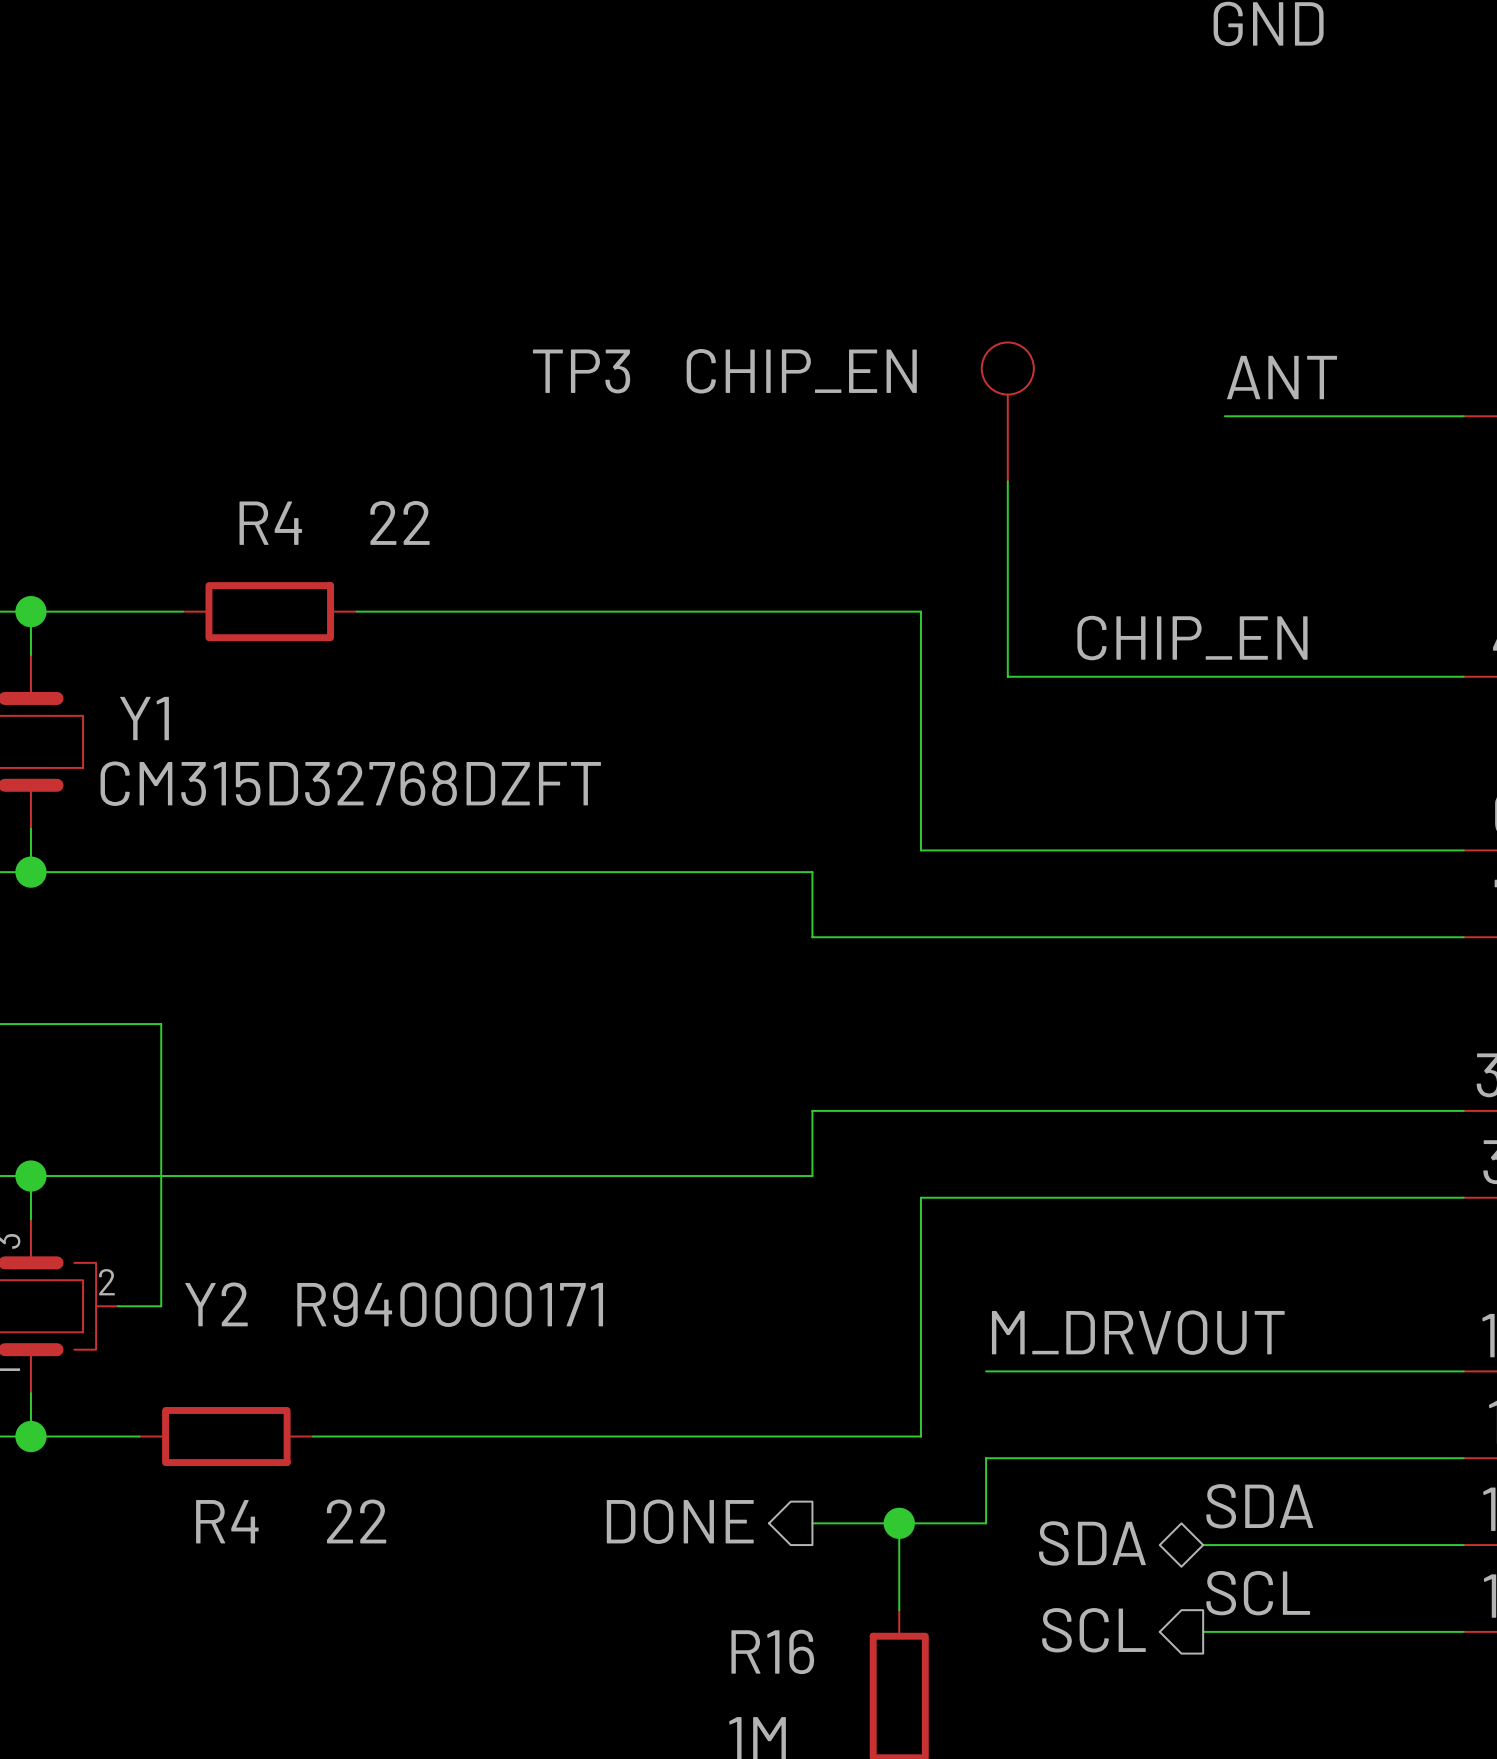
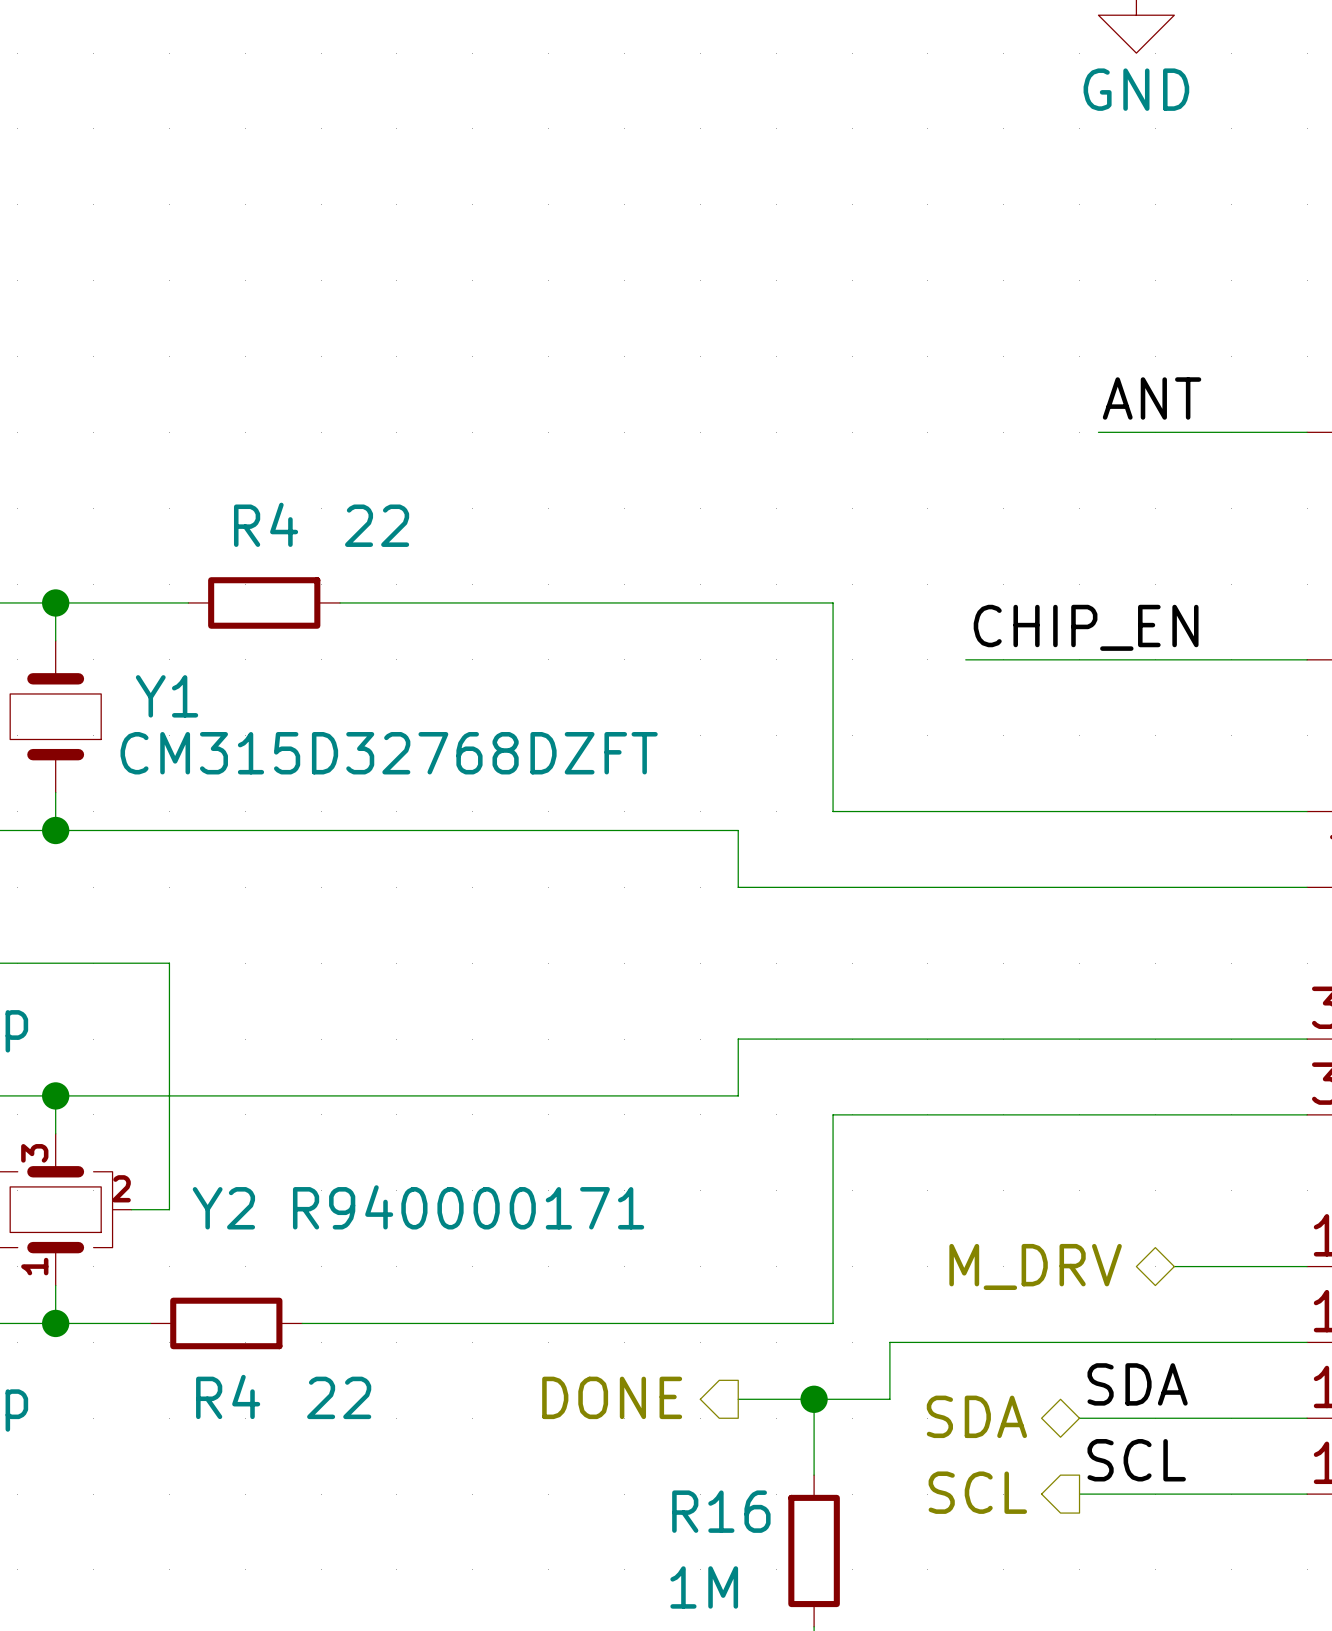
TP3: CHIP_EN (1007, 411) -> none
wire: (1007, 481) (1007, 676) (1072, 676) -> none
label: M_DRVOUT (1138, 1332) -> none
hierarchical label: none -> M_DRV (1035, 1266)
wire: (986, 1371) (1311, 1371) -> none

